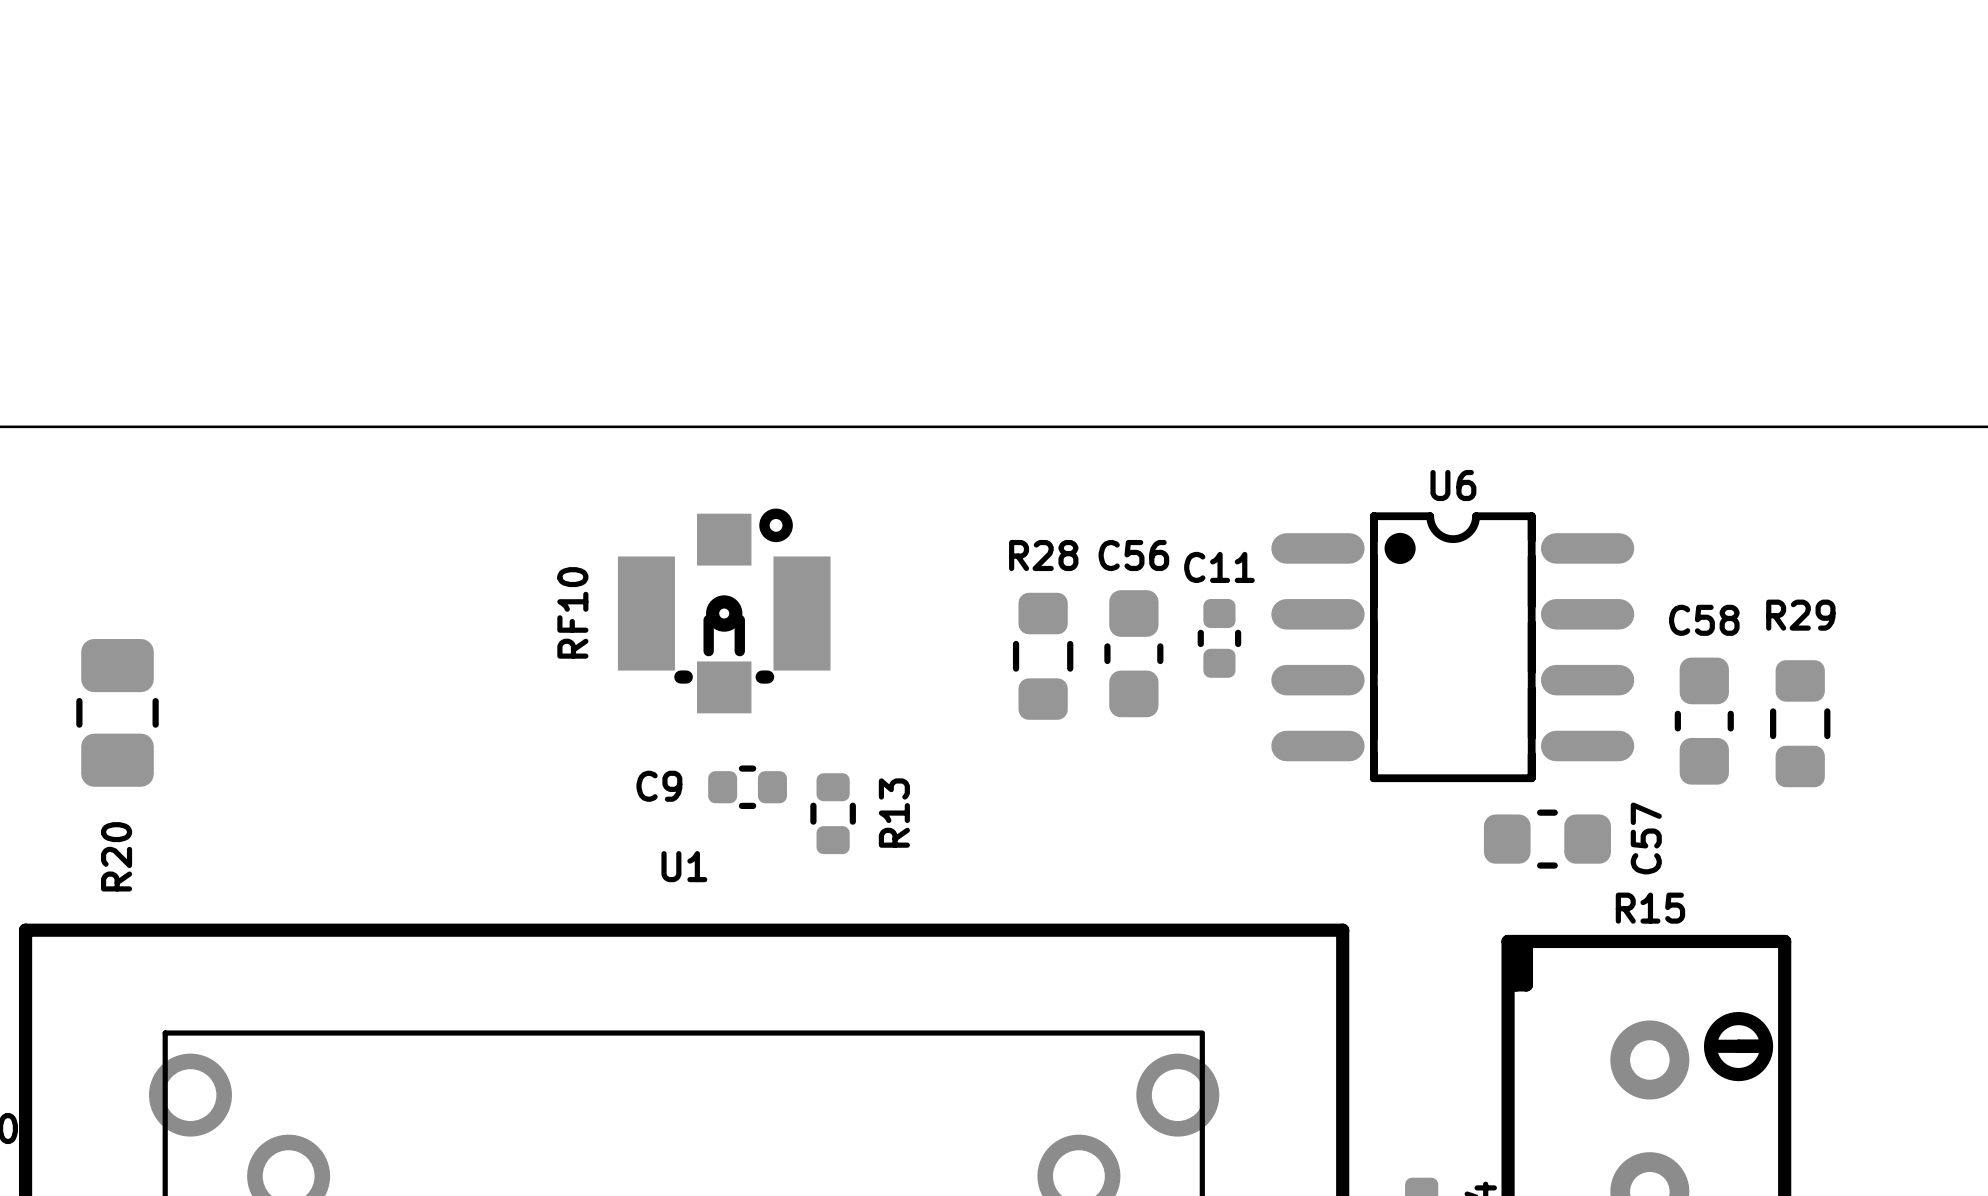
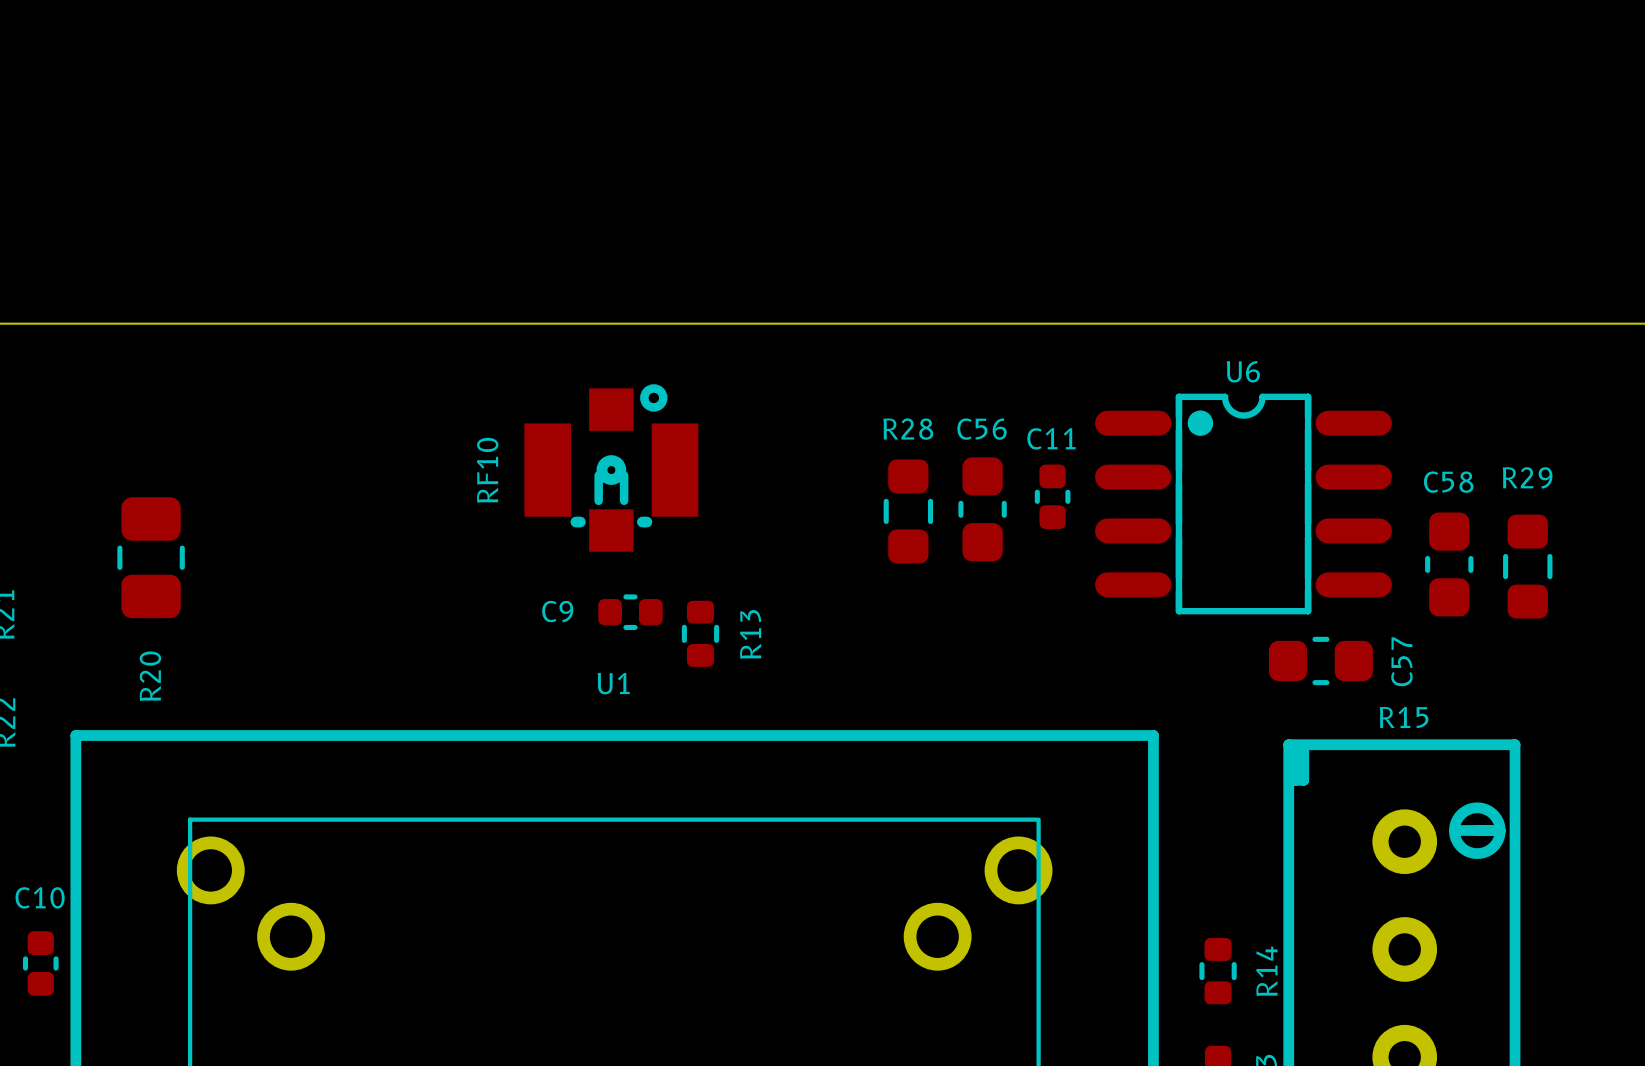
RF10 position: (724, 610) -> (611, 467)
C9 position: (747, 787) -> (630, 612)
R13 position: (833, 813) -> (700, 633)

